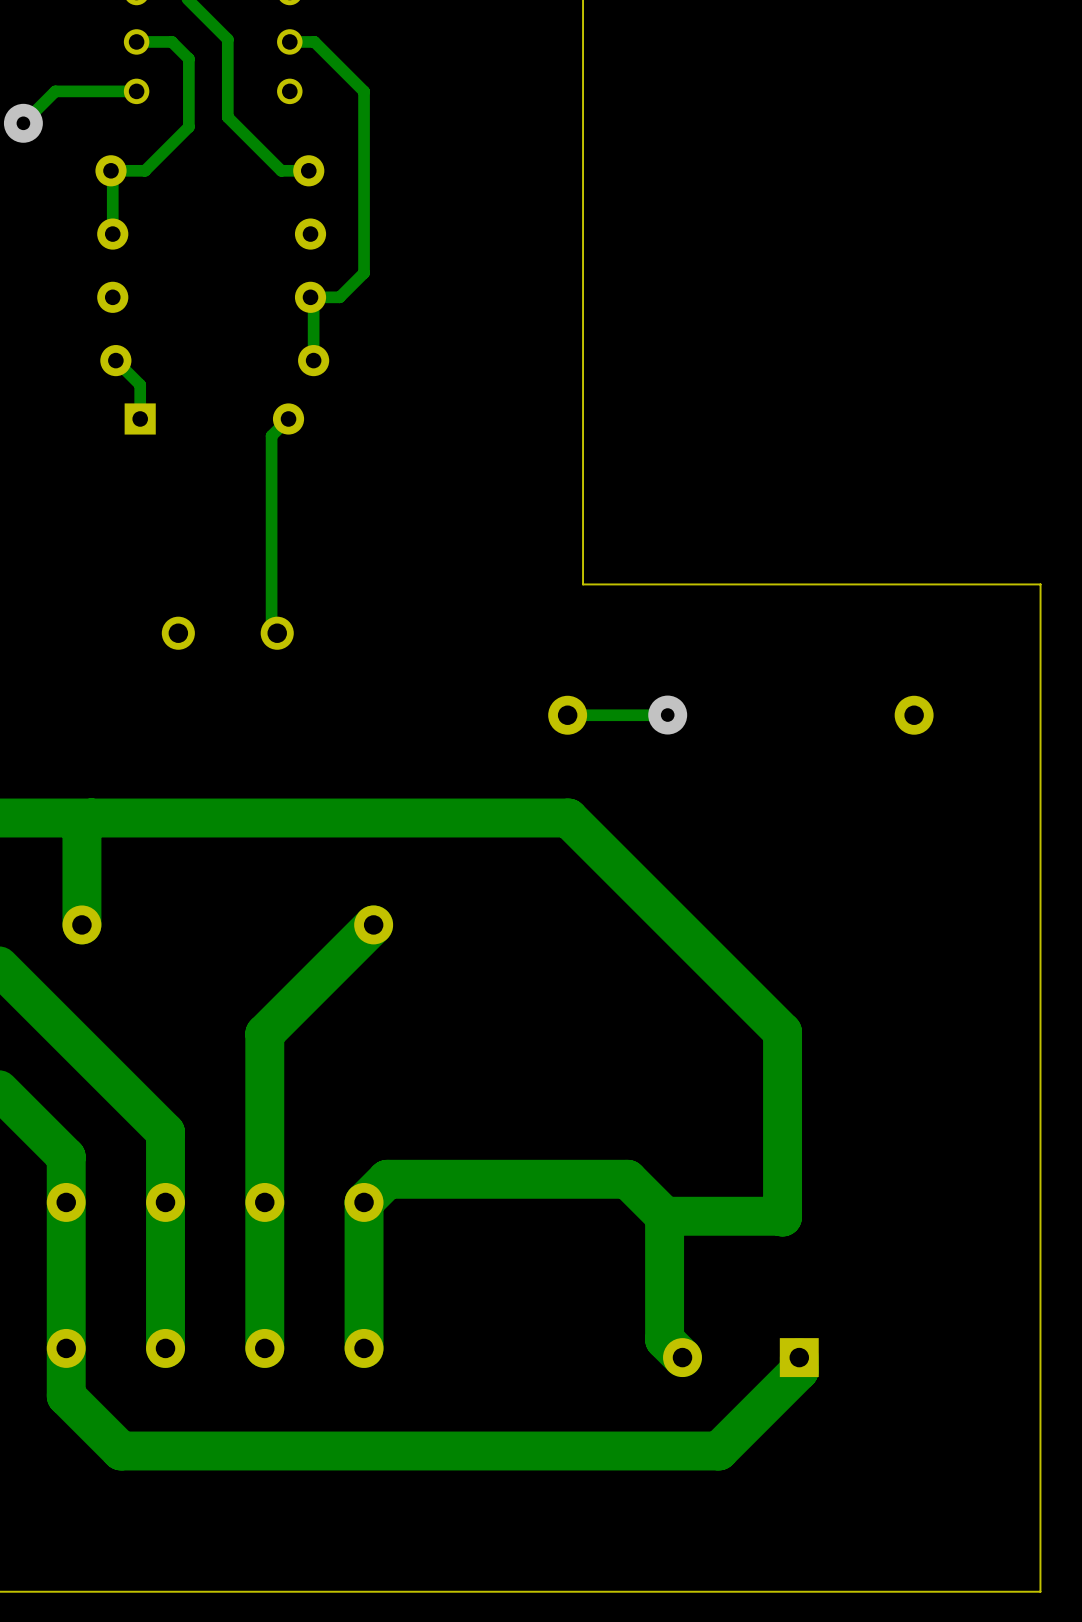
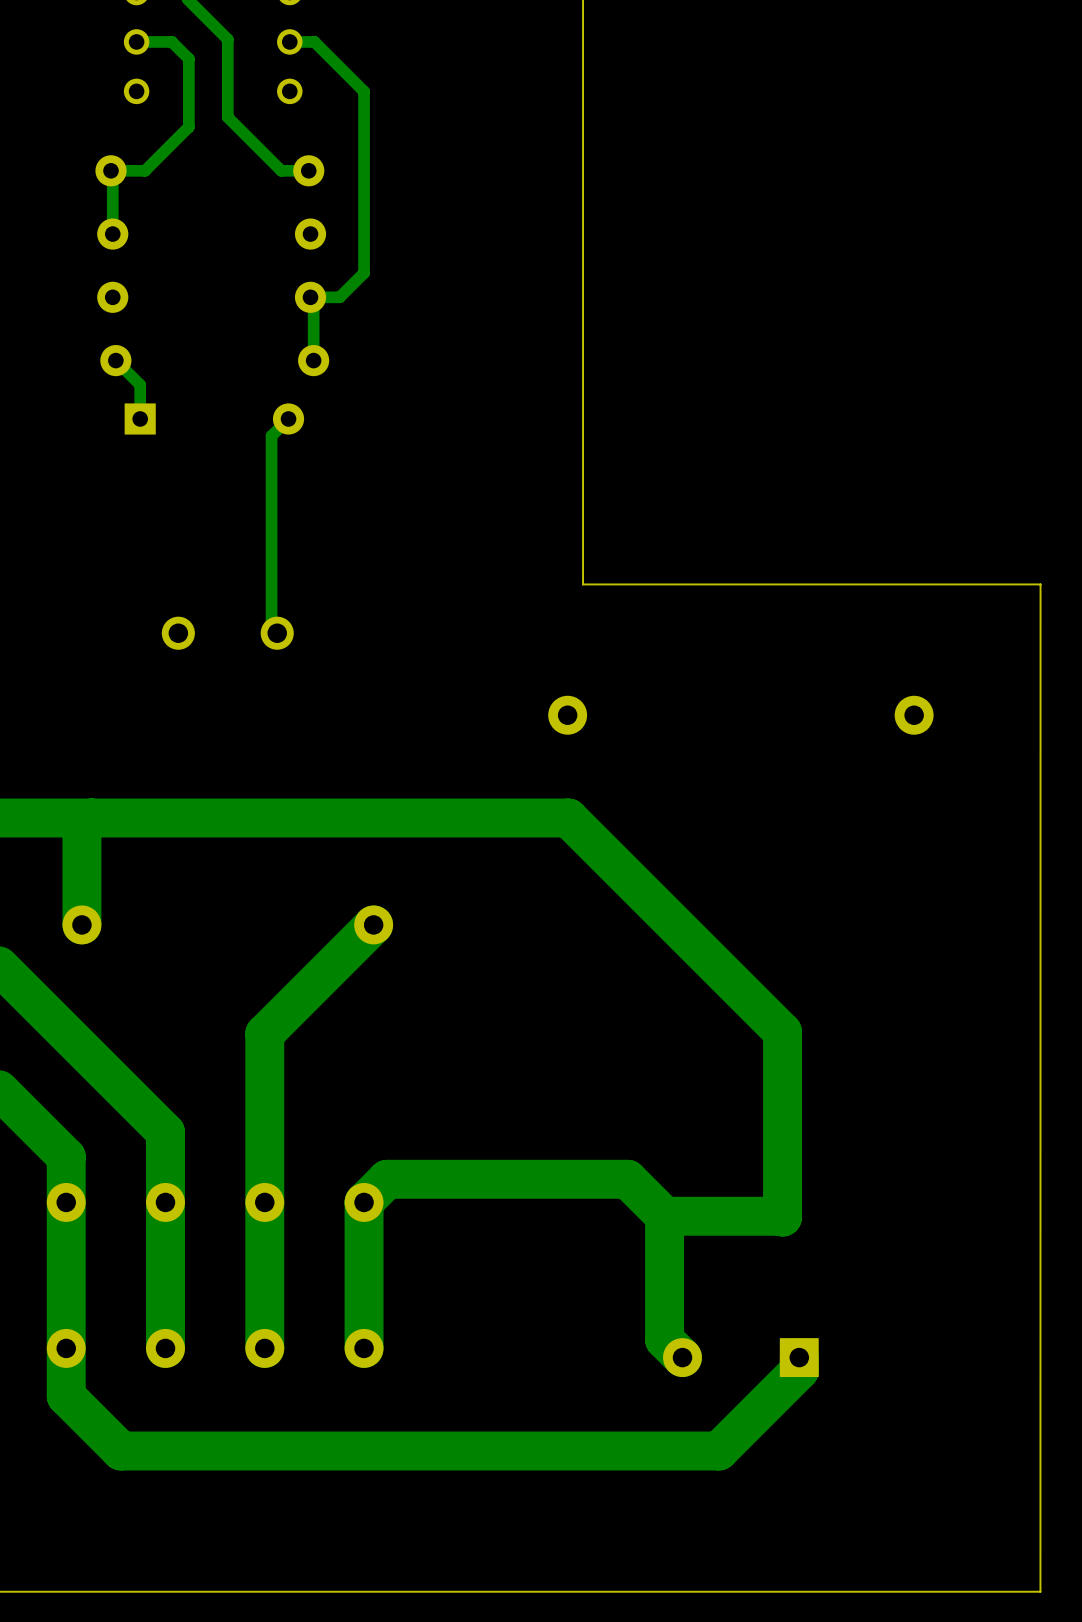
track: (136, 91) (55, 91) (23, 123) -> none
via: (23, 123) -> none
track: (667, 715) (567, 715) -> none
via: (667, 715) -> none

